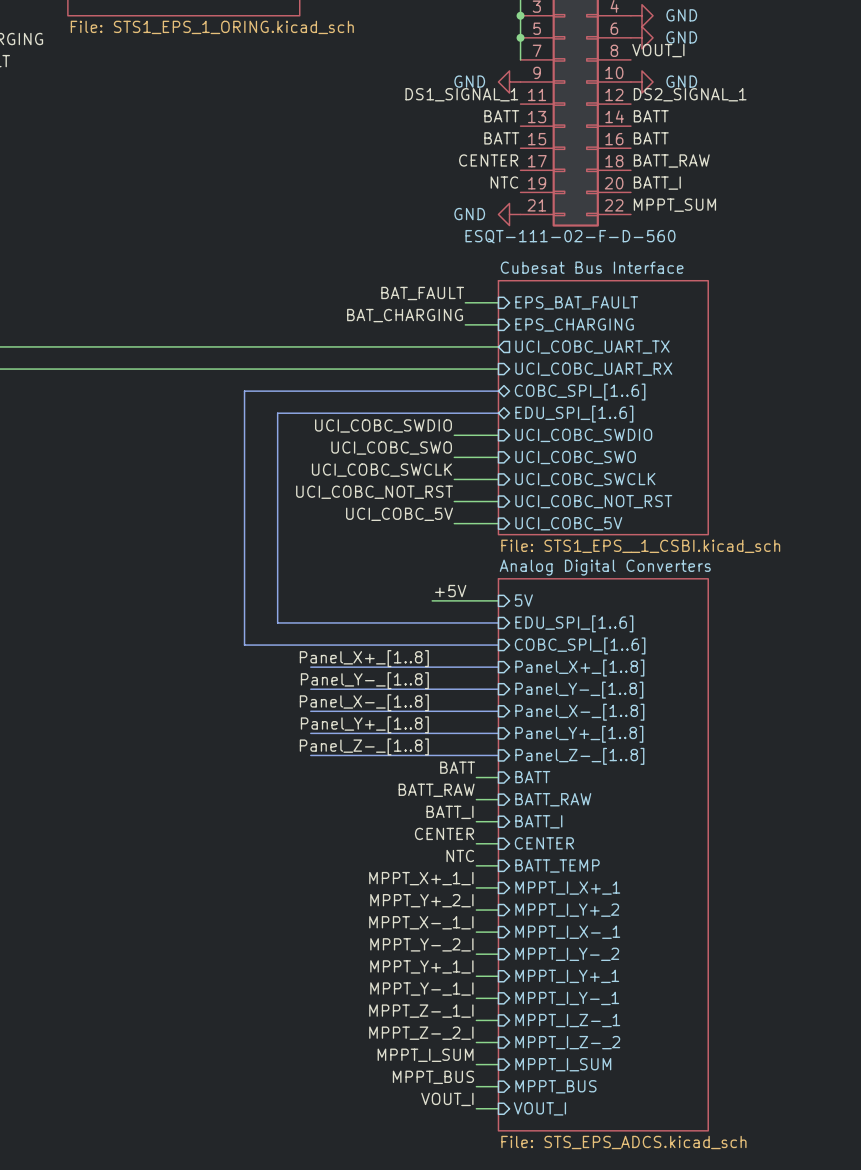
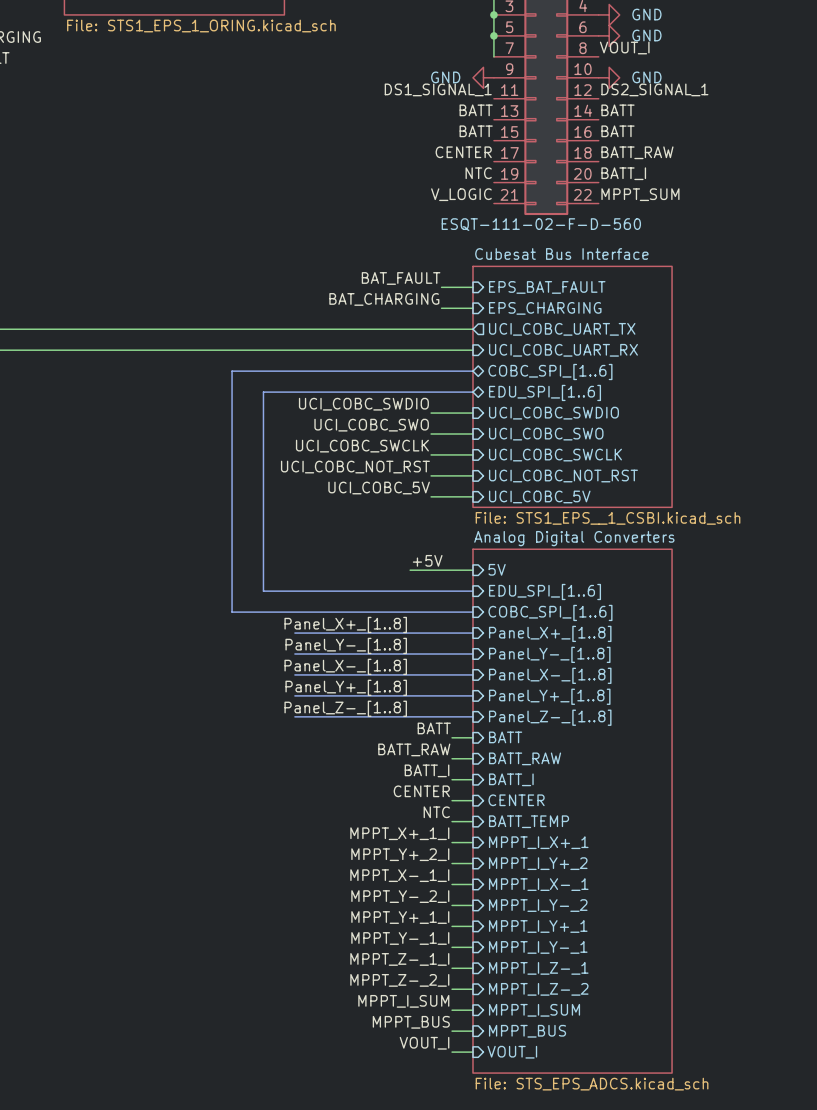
label: none -> V_LOGIC (461, 194)
power symbol: GND (509, 214) -> none

